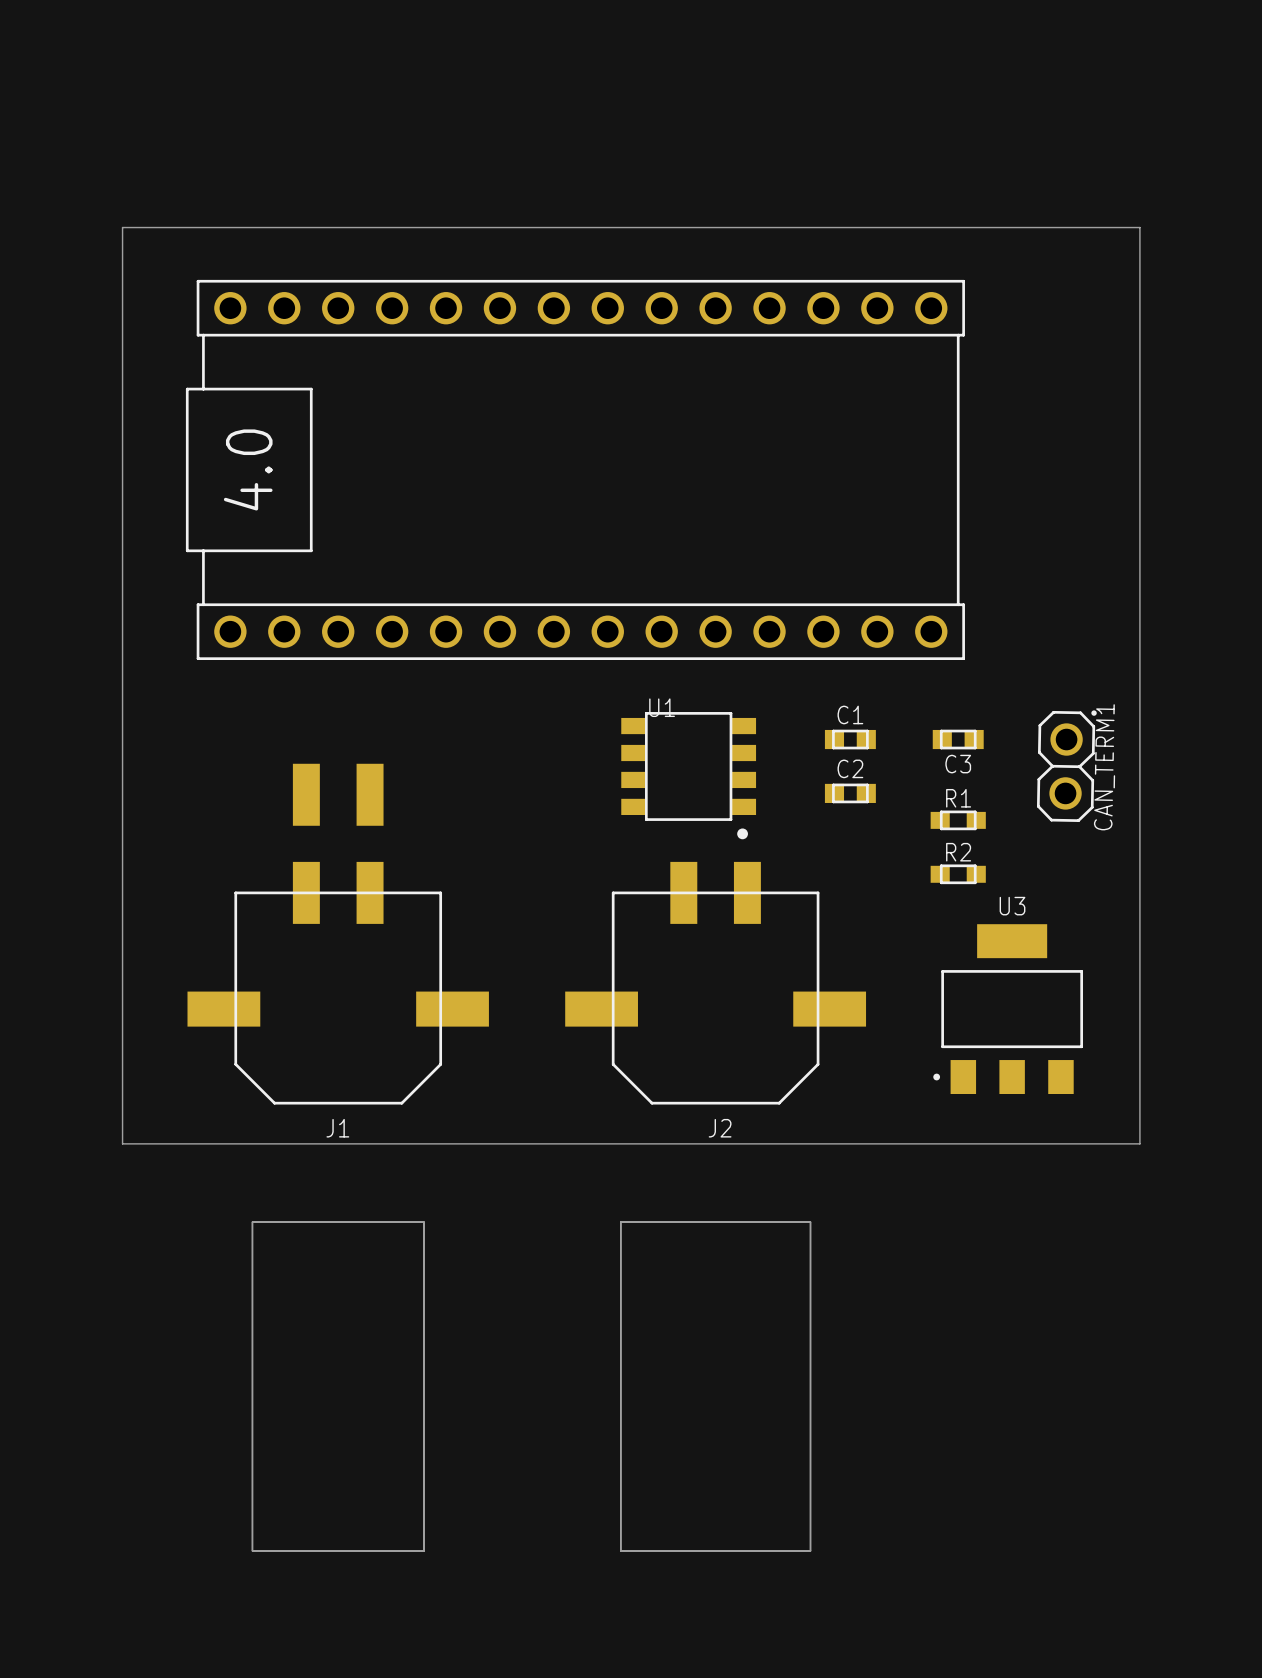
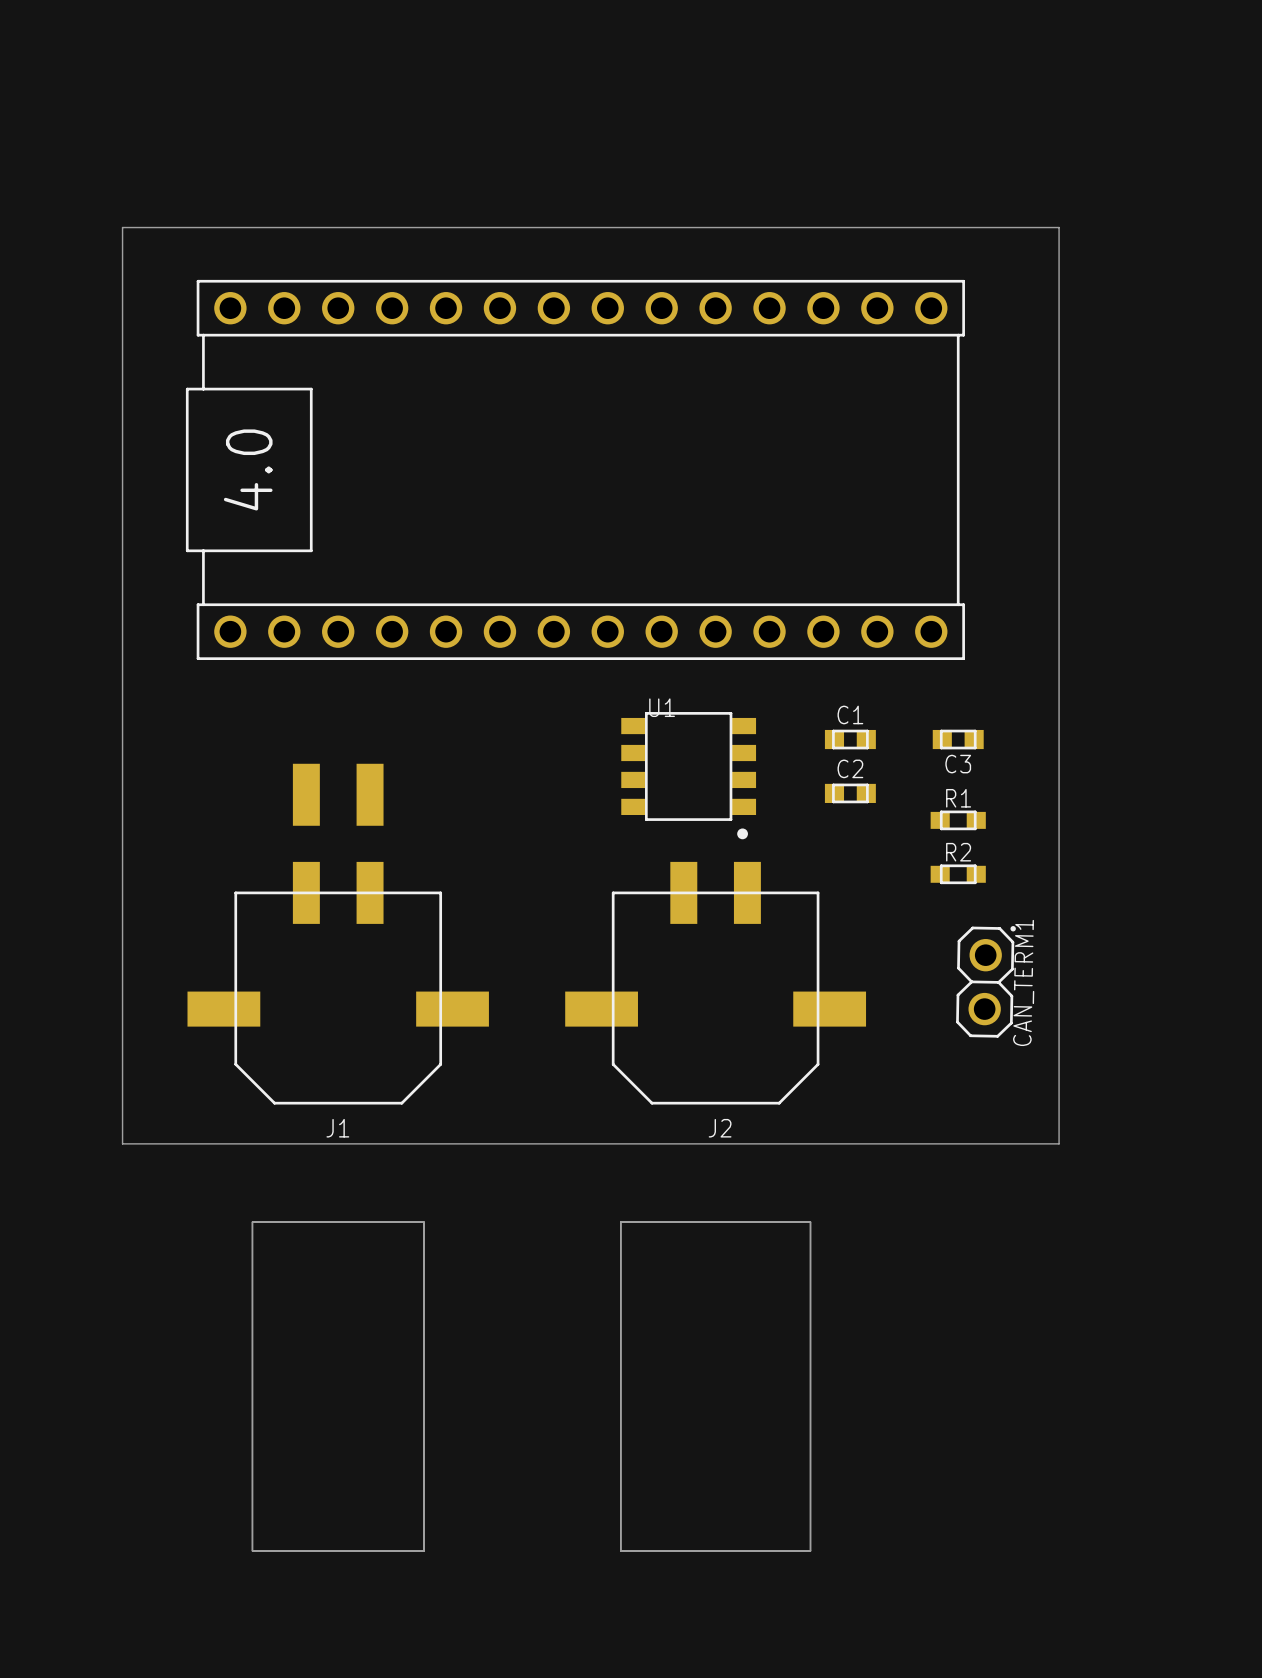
board edge: (1059, 227) (1139, 227) (1139, 1143) (1059, 1143) -> (1059, 227) (1059, 1143)
CAN_TERM1 position: (1066, 766) -> (985, 981)
U3: (1008, 1009) -> none

